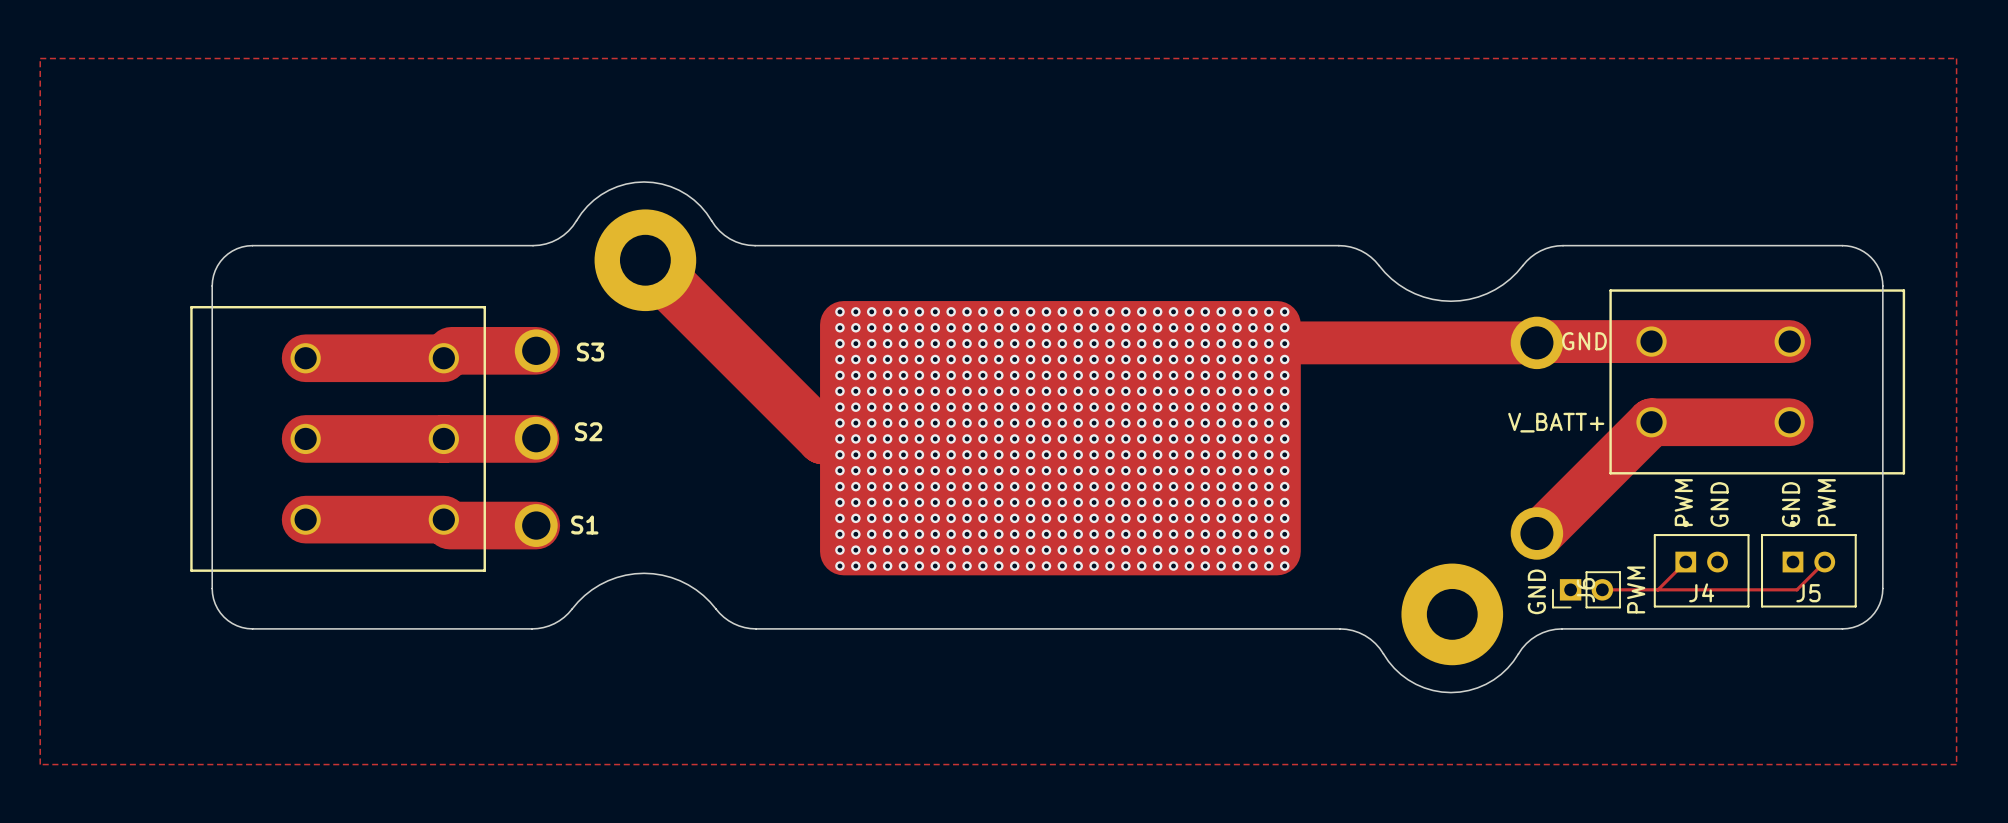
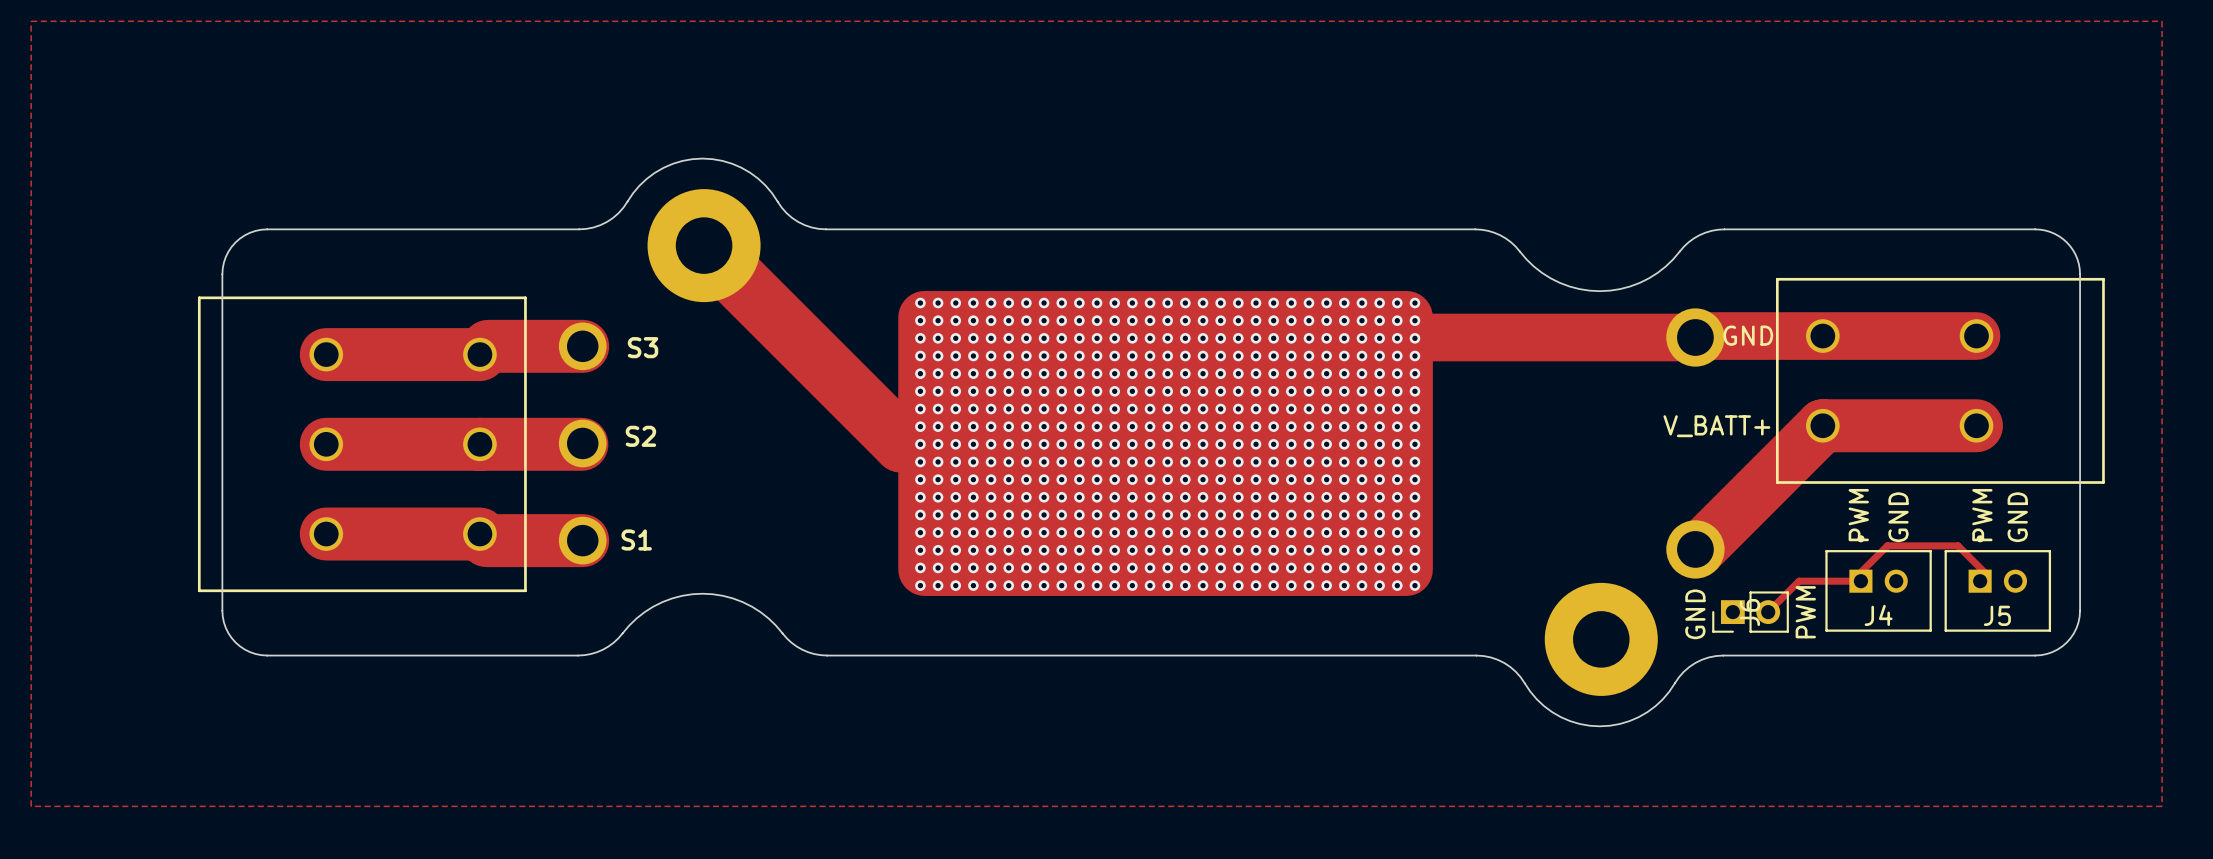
text: PWM (1826, 502) -> GND (2017, 517)
text: GND (1791, 504) -> PWM (1982, 515)
track: (1685, 562) (1657, 589) -> none
track: (1824, 562) (1796, 589) (1602, 589) -> (1984, 581) (1984, 572) (1958, 545) (1887, 545) (1860, 572) (1860, 581) (1799, 581) (1768, 612)

